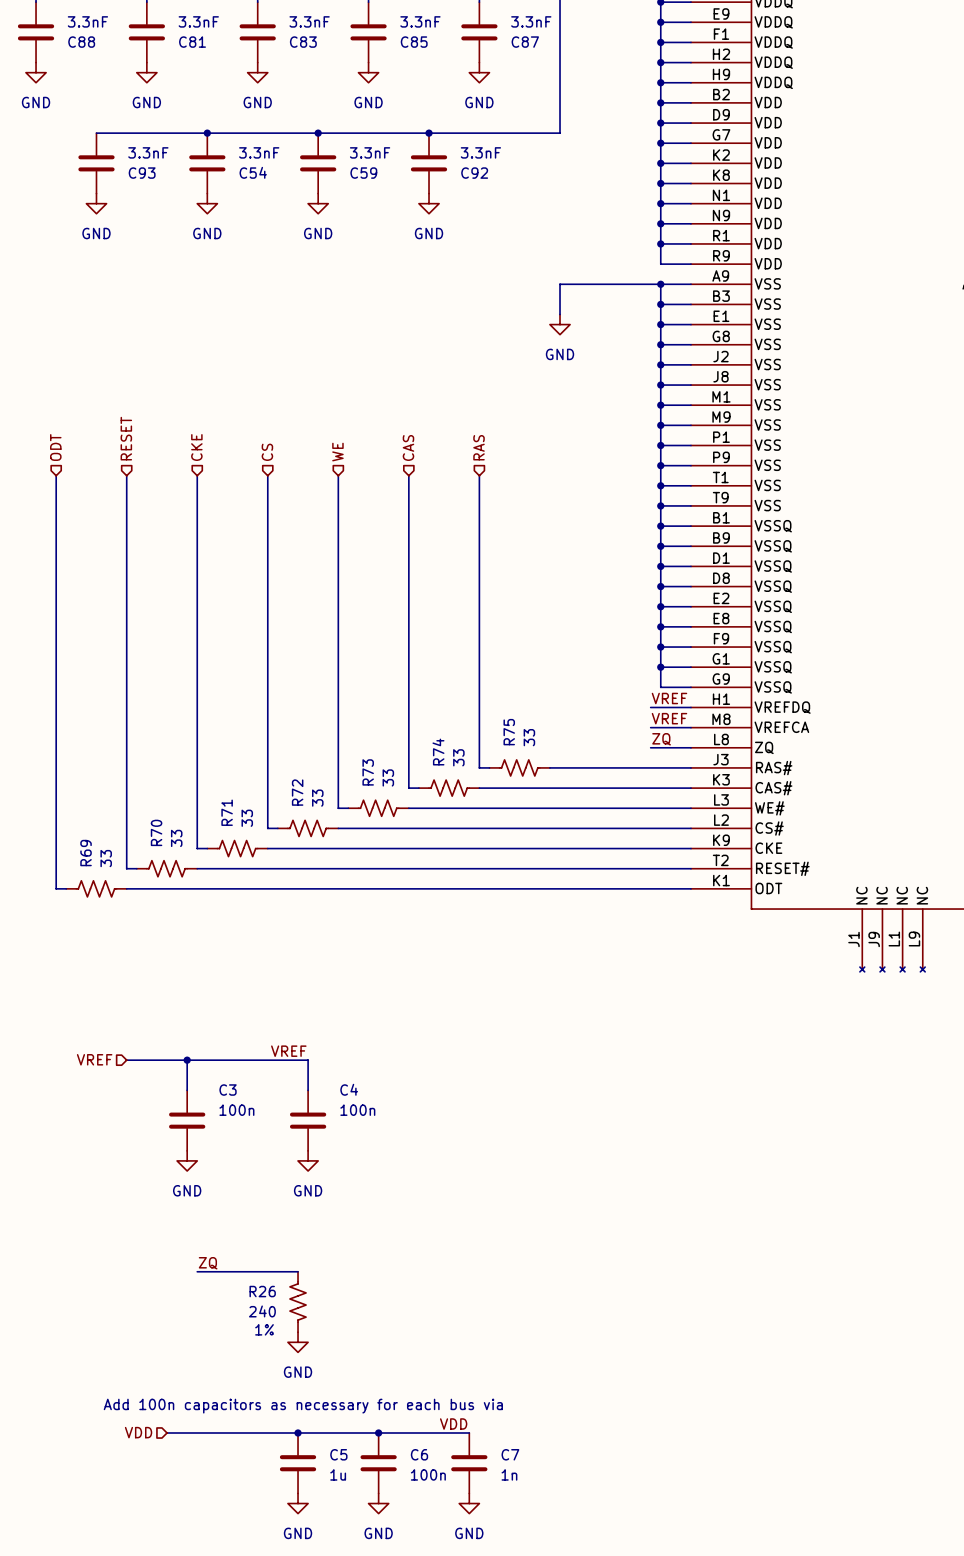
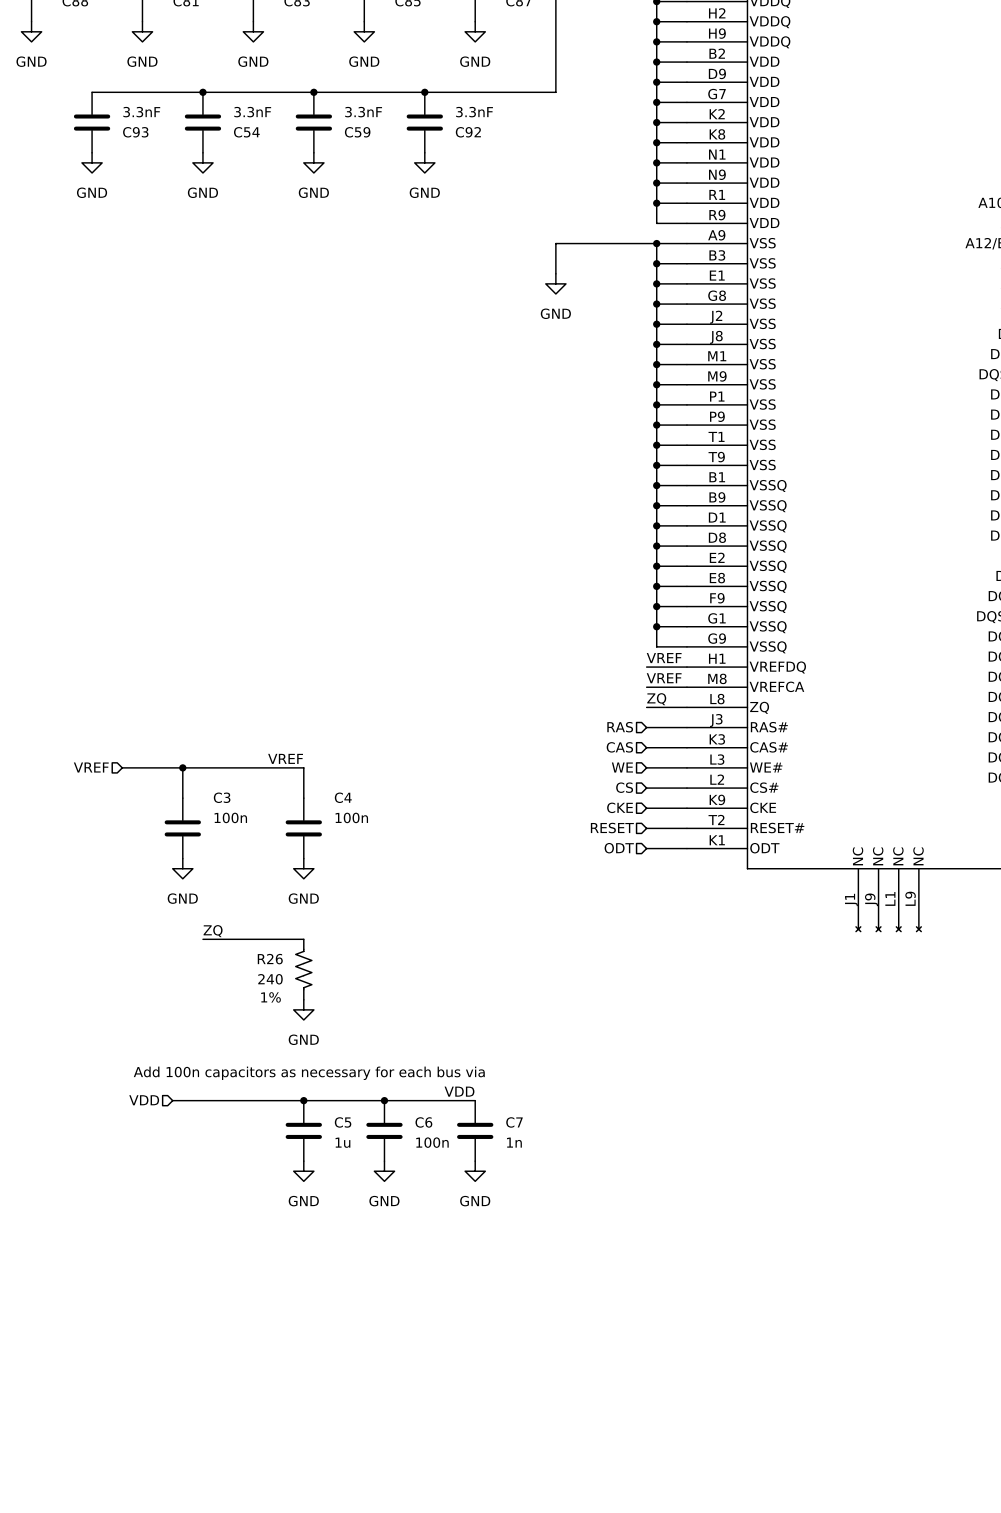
hierarchical label: RESET (126, 438) -> none
hierarchical label: ODT (55, 447) -> none
hierarchical label: CKE (196, 447) -> none
hierarchical label: CAS (408, 447) -> none
hierarchical label: RAS (479, 447) -> none
hierarchical label: CS (267, 452) -> none
hierarchical label: WE (337, 452) -> none
wire: (56, 475) (56, 888) (66, 888) -> none
wire: (126, 475) (126, 868) (136, 868) -> none
wire: (197, 475) (197, 848) (207, 848) -> none
wire: (267, 475) (267, 828) (277, 828) -> none
wire: (338, 475) (338, 808) (348, 808) -> none
wire: (408, 475) (408, 788) (418, 788) -> none
wire: (479, 475) (479, 767) (489, 767) -> none
R75: 33 (519, 767) -> none
wire: (549, 767) (650, 767) -> none
hierarchical label: none -> RAS (620, 727)
hierarchical label: none -> CAS (619, 747)
R74: 33 (449, 788) -> none
wire: (479, 788) (650, 788) -> none
label: none -> VREF (285, 758)
hierarchical label: none -> VREF (91, 767)
hierarchical label: none -> WE (622, 767)
wire: none -> (122, 767) (303, 767) (303, 798)
wire: none -> (182, 767) (182, 798)
junction: none -> (182, 767)
R73: 33 (378, 808) -> none
wire: (408, 808) (650, 808) -> none
R72: 33 (308, 828) -> none
wire: (338, 828) (650, 828) -> none
hierarchical label: none -> CS (624, 787)
R71: 33 (237, 848) -> none
wire: (267, 848) (650, 848) -> none
hierarchical label: none -> CKE (620, 807)
R70: 33 (167, 868) -> none
wire: (197, 868) (650, 868) -> none
hierarchical label: none -> RESET (612, 828)
R69: 33 (96, 888) -> none
wire: (126, 888) (650, 888) -> none
hierarchical label: none -> ODT (619, 848)
power symbol: none -> GND (182, 868)
power symbol: none -> GND (303, 868)
label: none -> ZQ (213, 931)
wire: none -> (202, 939) (303, 939)
power symbol: none -> GND (303, 1009)
label: VREF (288, 1051) -> none
hierarchical label: VREF (94, 1059) -> none
wire: (126, 1060) (308, 1060) (308, 1090) -> none
wire: (187, 1060) (187, 1090) -> none
junction: (187, 1060) -> none
text: none -> Add 100n capacitors as necessary for each bus via (309, 1073)
C3 position: (187, 1120) -> (182, 828)
C4 position: (308, 1120) -> (303, 828)
label: none -> VDD (459, 1091)
hierarchical label: none -> VDD (144, 1100)
wire: none -> (172, 1100) (475, 1100)
junction: none -> (303, 1100)
junction: none -> (384, 1100)
power symbol: GND (187, 1160) -> none
power symbol: GND (308, 1160) -> none
power symbol: none -> GND (303, 1171)
power symbol: none -> GND (384, 1171)
power symbol: none -> GND (475, 1171)
label: ZQ (208, 1263) -> none
wire: (197, 1271) (298, 1271) -> none
R26 position: (298, 1302) -> (303, 969)
power symbol: GND (298, 1342) -> none
text: Add 100n capacitors as necessary for each bus via (303, 1406) -> none
label: VDD (453, 1424) -> none
hierarchical label: VDD (138, 1432) -> none
wire: (167, 1433) (469, 1433) -> none
junction: (298, 1433) -> none
junction: (378, 1433) -> none
C5 position: (298, 1463) -> (303, 1130)
C6 position: (378, 1463) -> (384, 1130)
C7 position: (469, 1463) -> (475, 1130)
power symbol: GND (298, 1503) -> none
power symbol: GND (378, 1503) -> none
power symbol: GND (469, 1503) -> none

